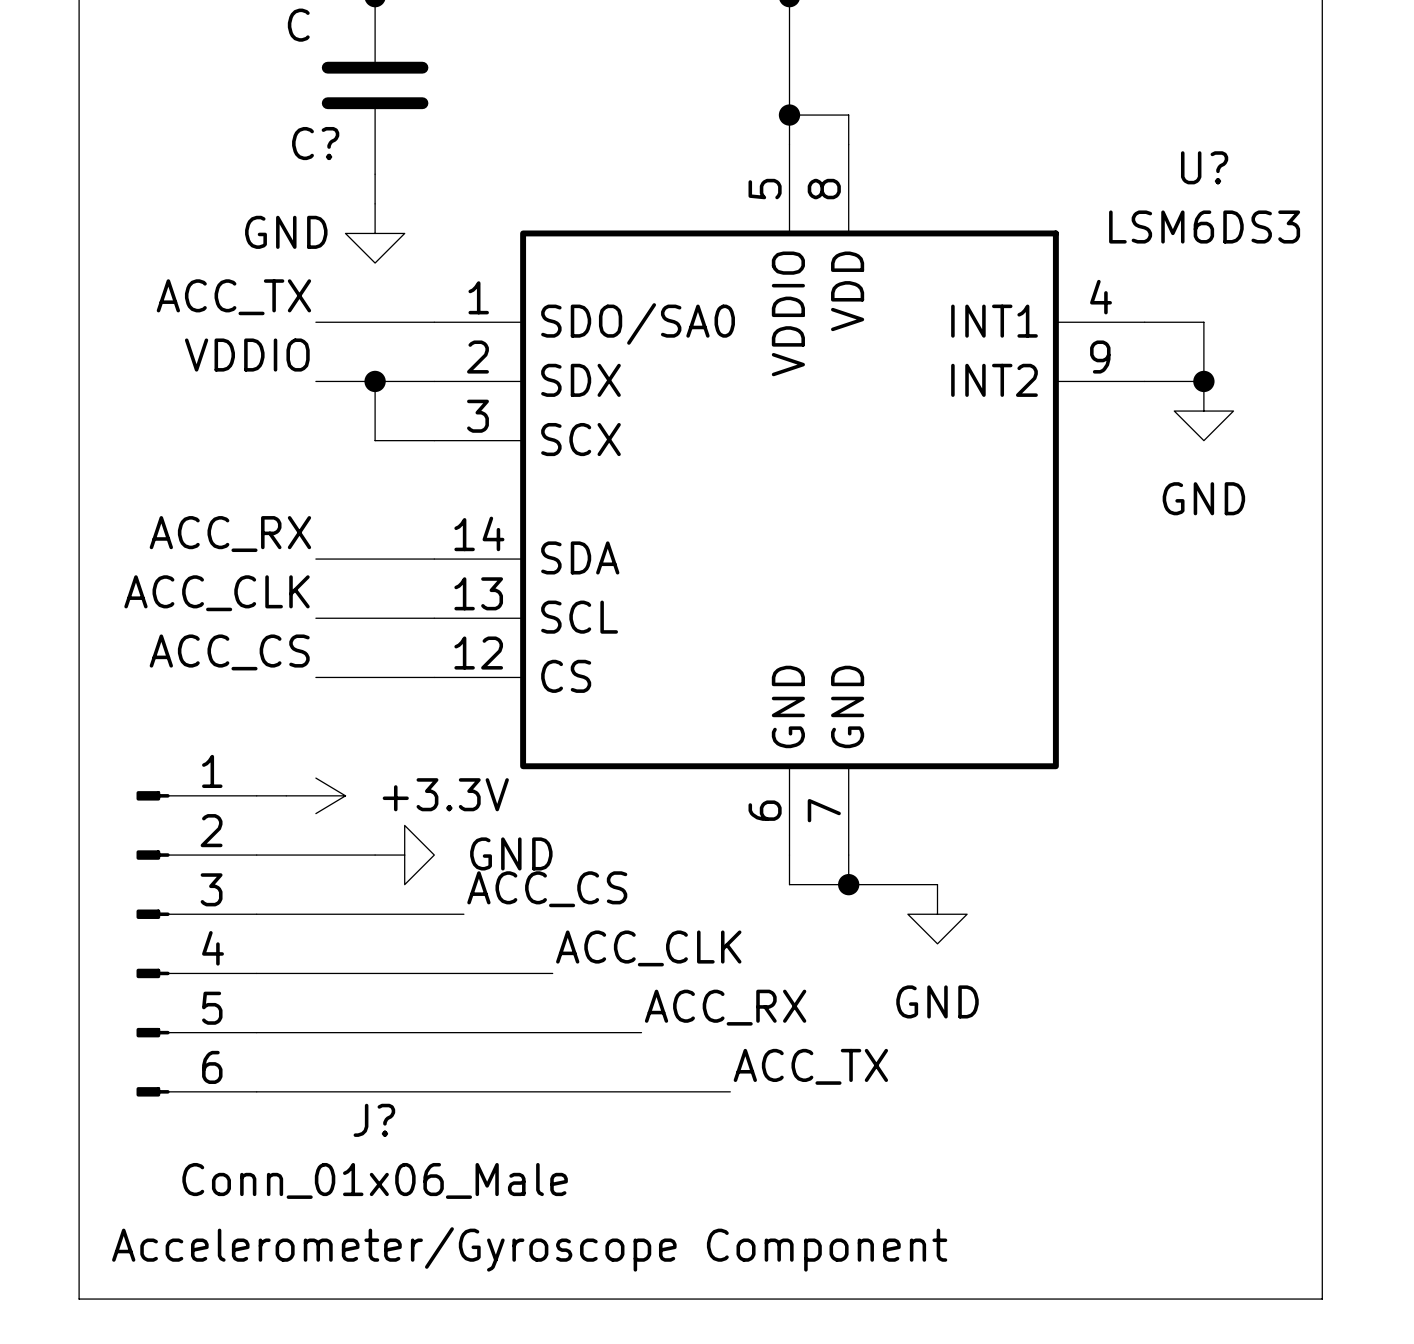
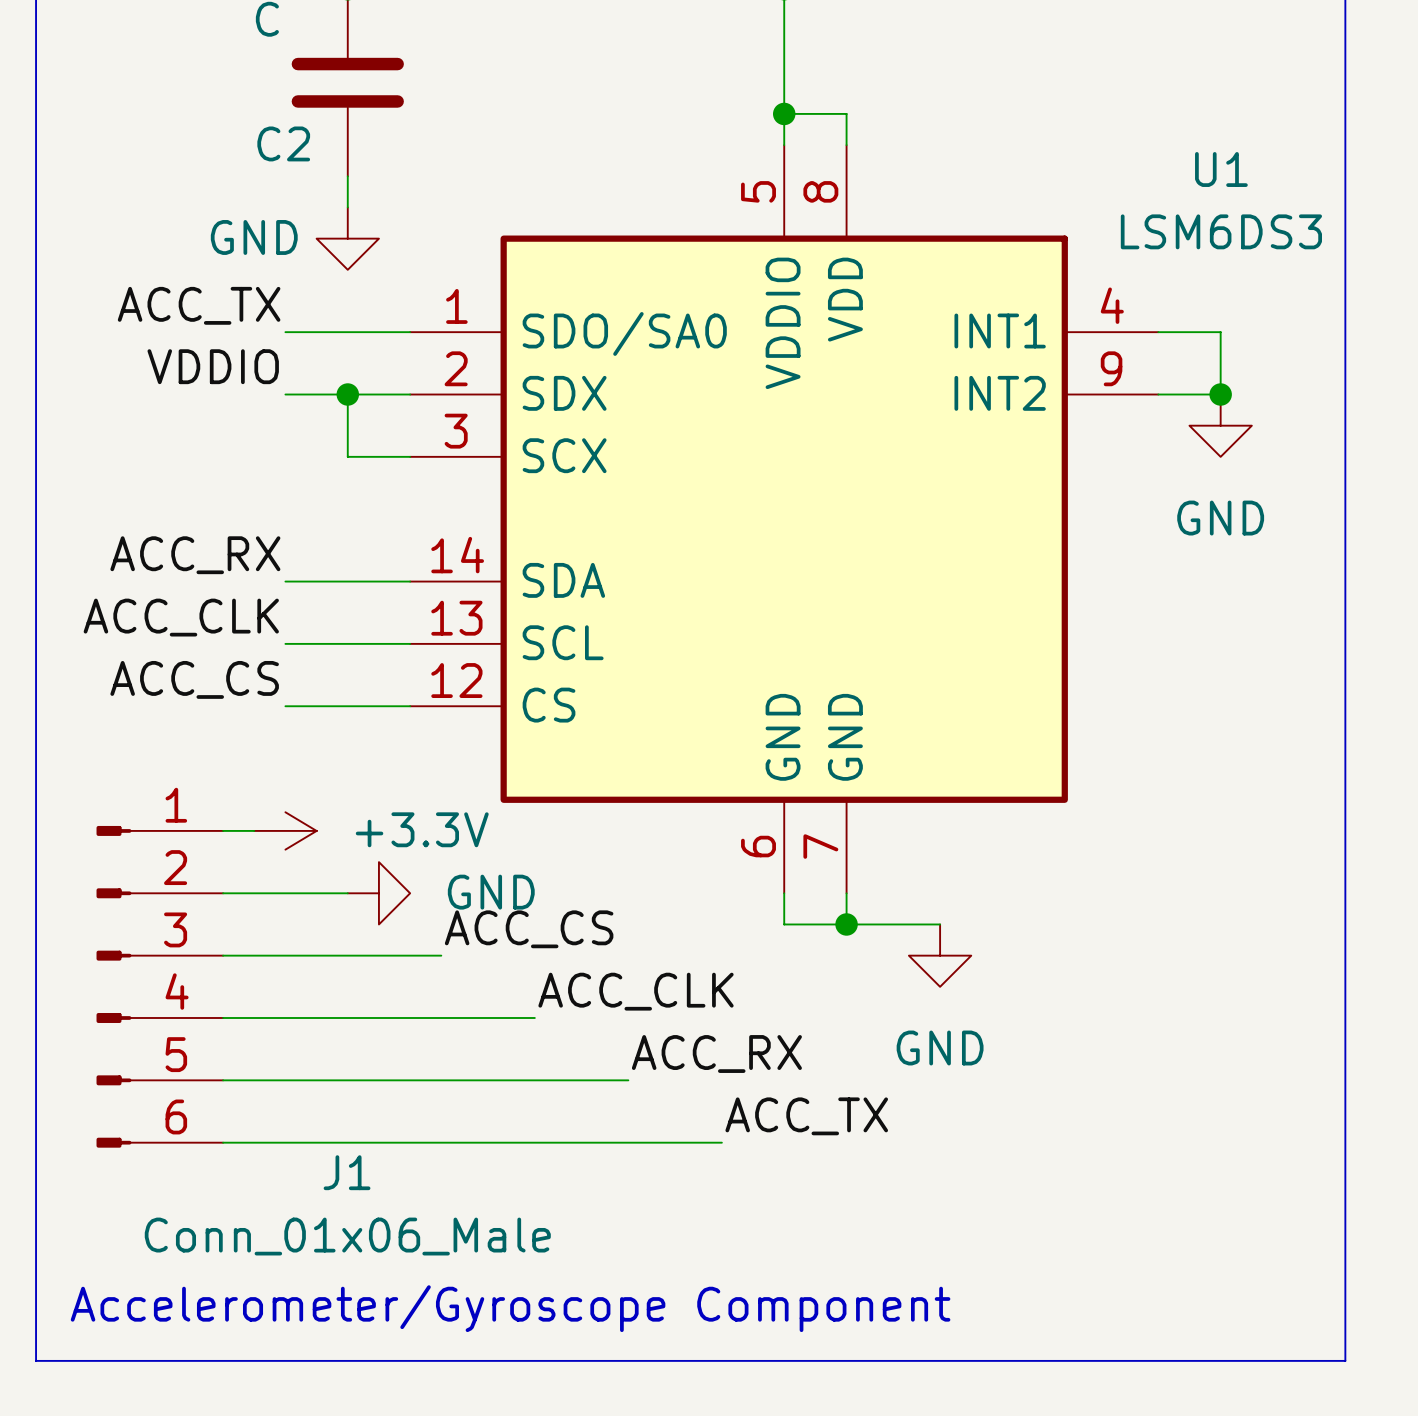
C? name: C? (315, 143) -> C2 (283, 143)
U? name: U? (1204, 167) -> U1 (1221, 169)
J? name: J? (374, 1120) -> J1 (347, 1172)

